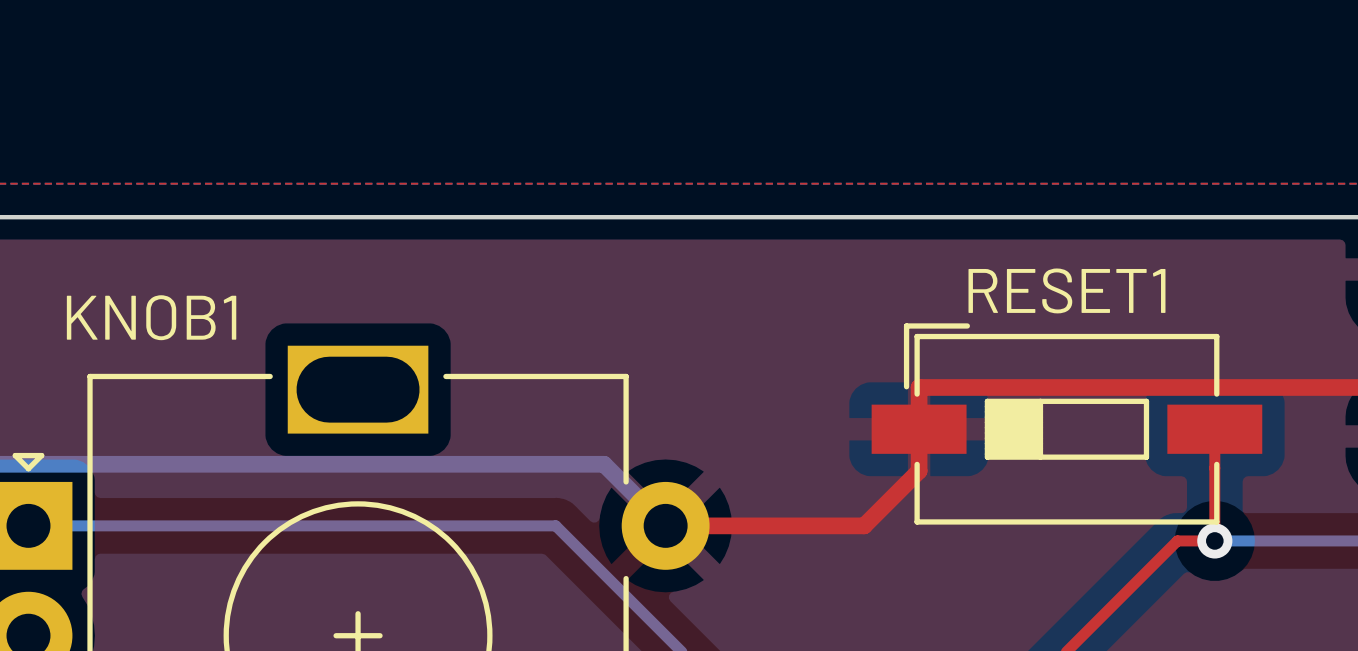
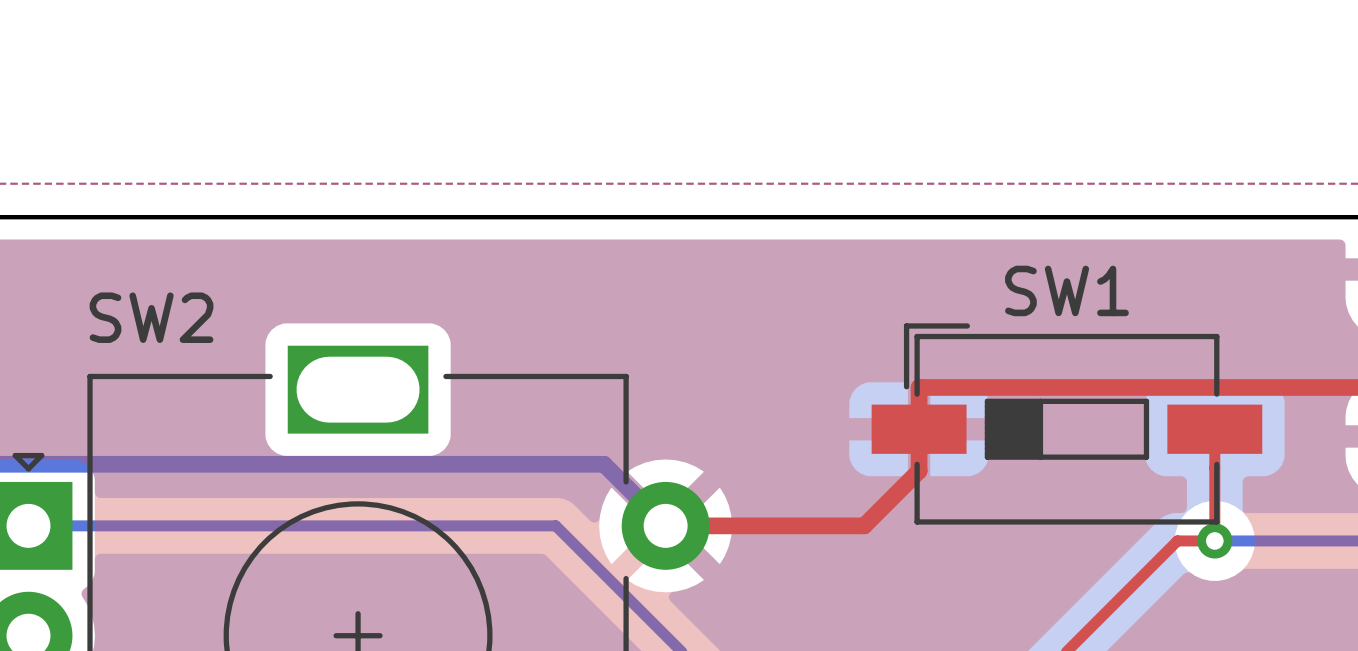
RESET1 name: RESET1 (1066, 290) -> SW1 (1066, 290)
KNOB1 name: KNOB1 (151, 317) -> SW2 (151, 317)

